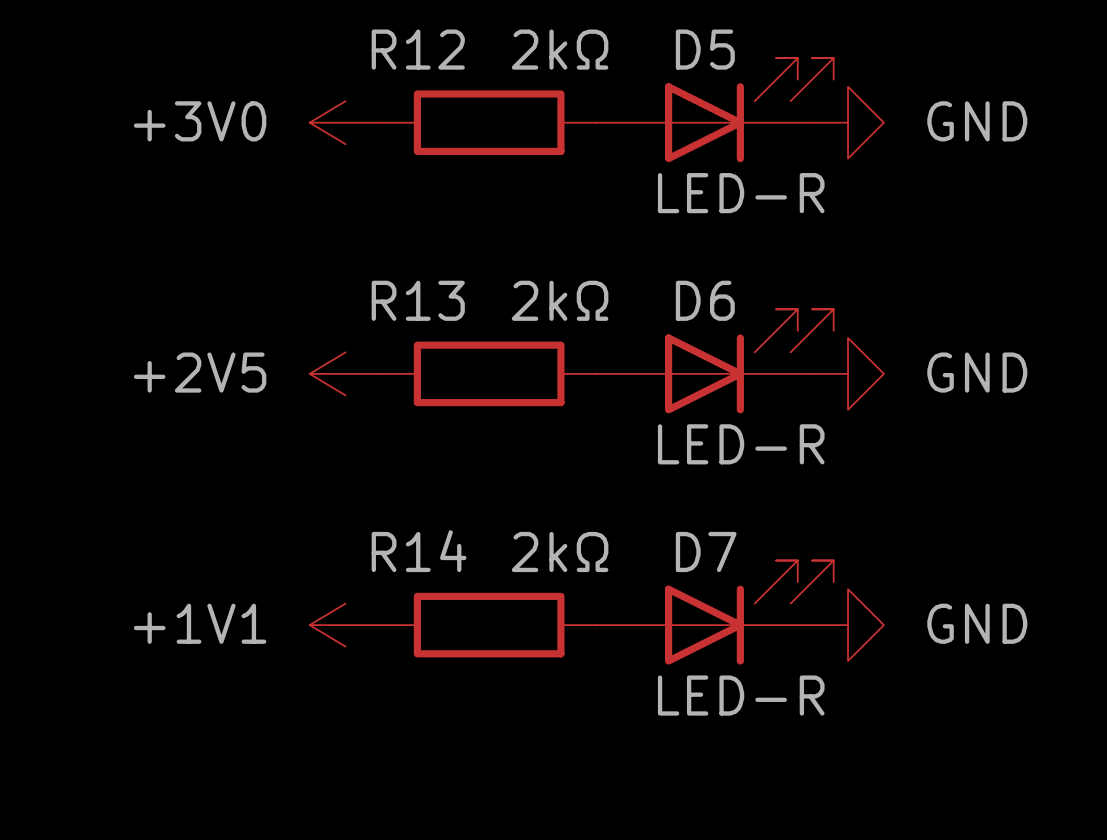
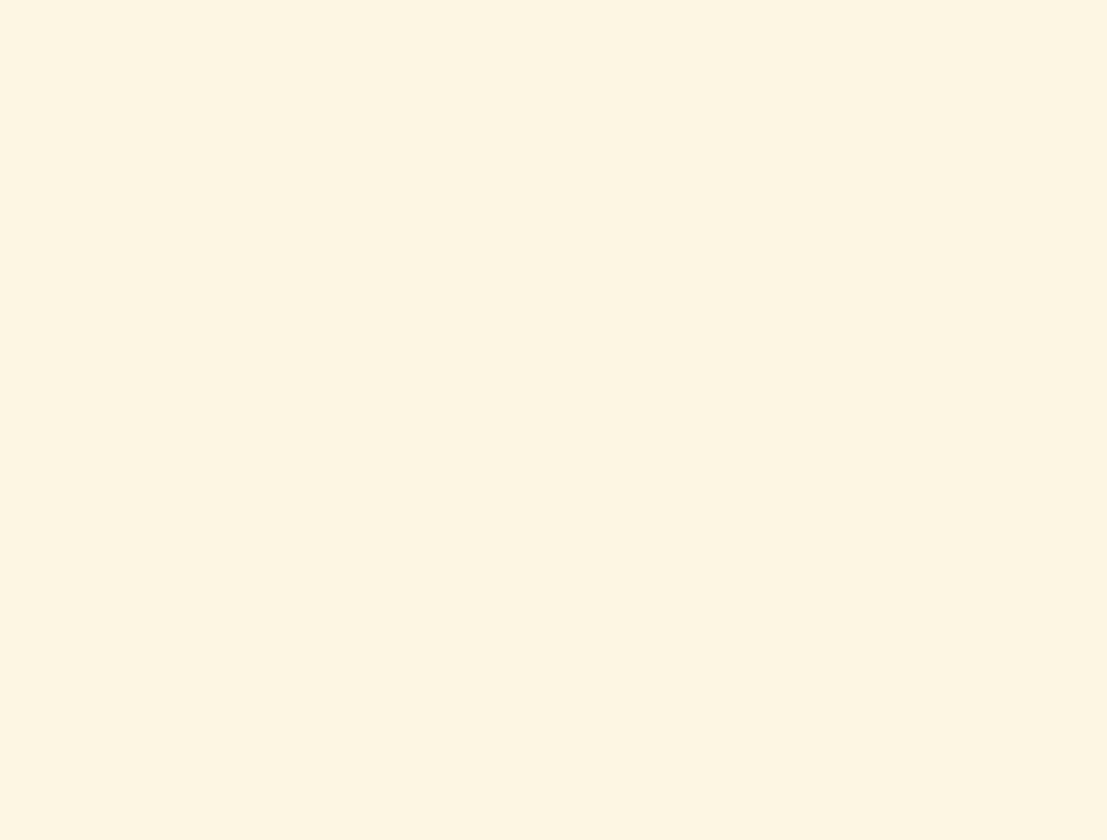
D5: LED-R (715, 110) -> none
power symbol: +3V0 (345, 122) -> none
R12: 2kΩ (489, 122) -> none
power symbol: GND (848, 122) -> none
D6: LED-R (715, 361) -> none
power symbol: +2V5 (345, 373) -> none
R13: 2kΩ (489, 373) -> none
power symbol: GND (848, 373) -> none
D7: LED-R (715, 612) -> none
power symbol: +1V1 (345, 625) -> none
R14: 2kΩ (489, 625) -> none
power symbol: GND (848, 625) -> none

